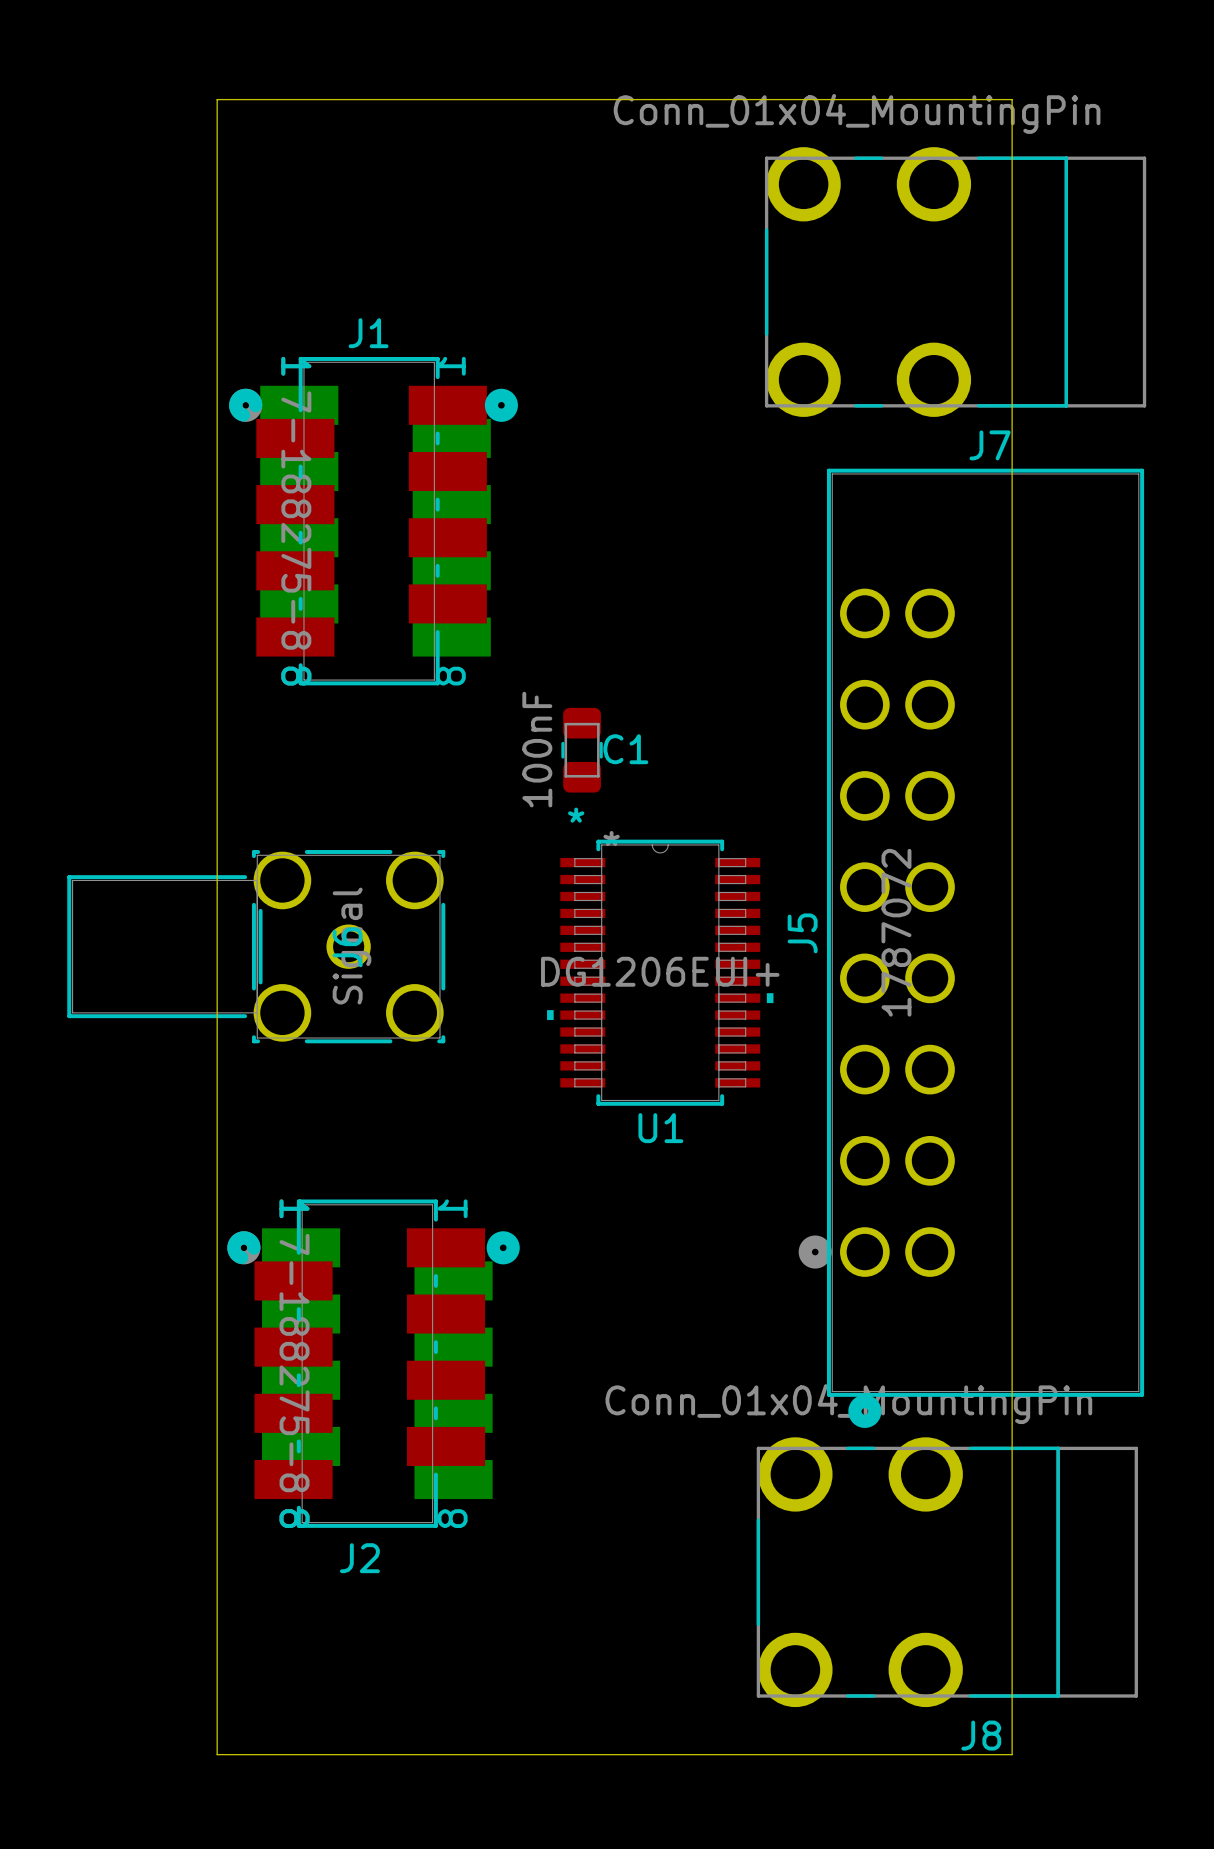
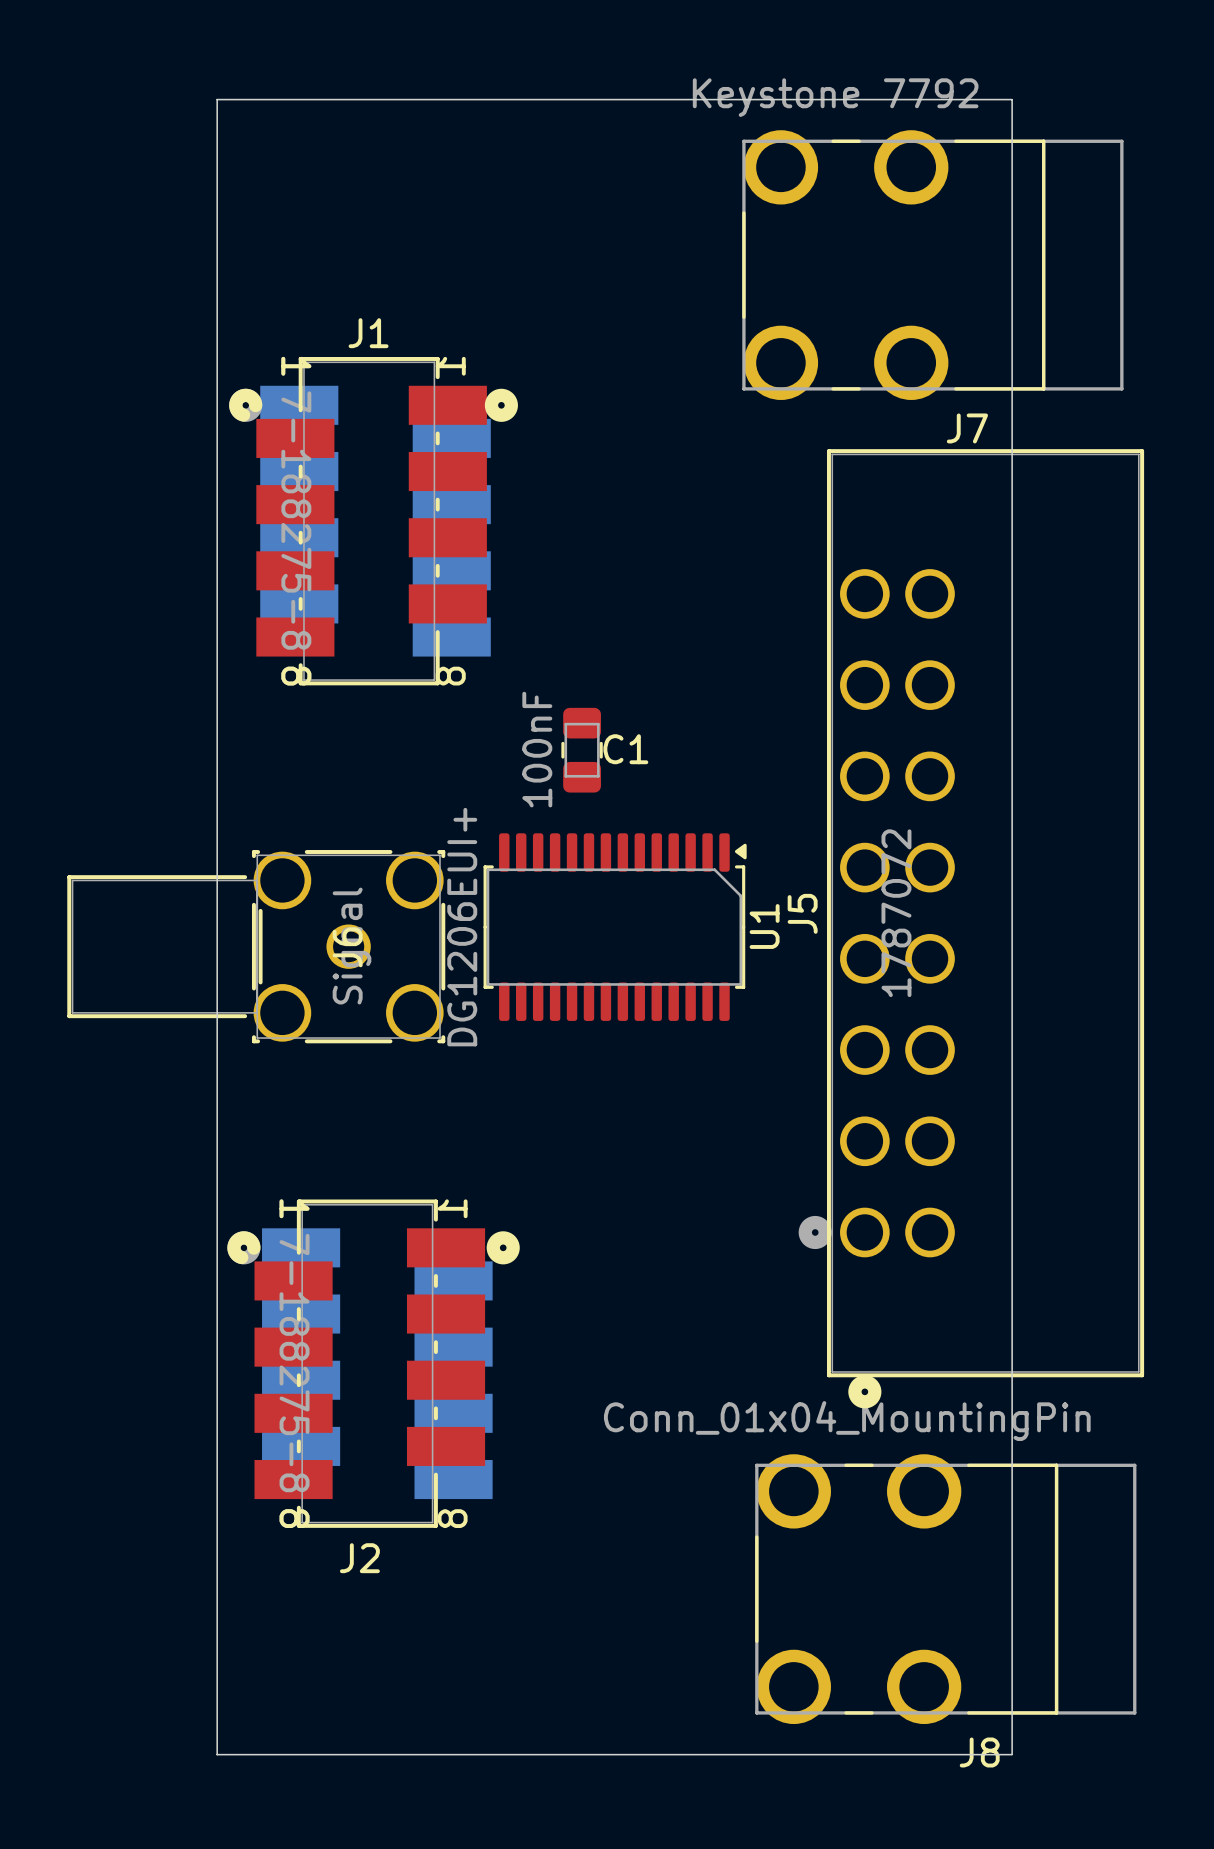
J7 value: Conn_01x04_MountingPin (857, 113) -> Keystone 7792 (835, 97)
J7 position: (955, 282) -> (932, 265)
U1 footprint: [547, 839, 774, 1106] -> [483, 833, 747, 1021]
J5 position: (971, 948) -> (971, 928)
U1 value position: DG1206EUI+ (660, 971) -> DG1206EUI+ (462, 927)
U1 name position: U1 (660, 1128) -> U1 (764, 926)
J8 position: (947, 1572) -> (945, 1589)

